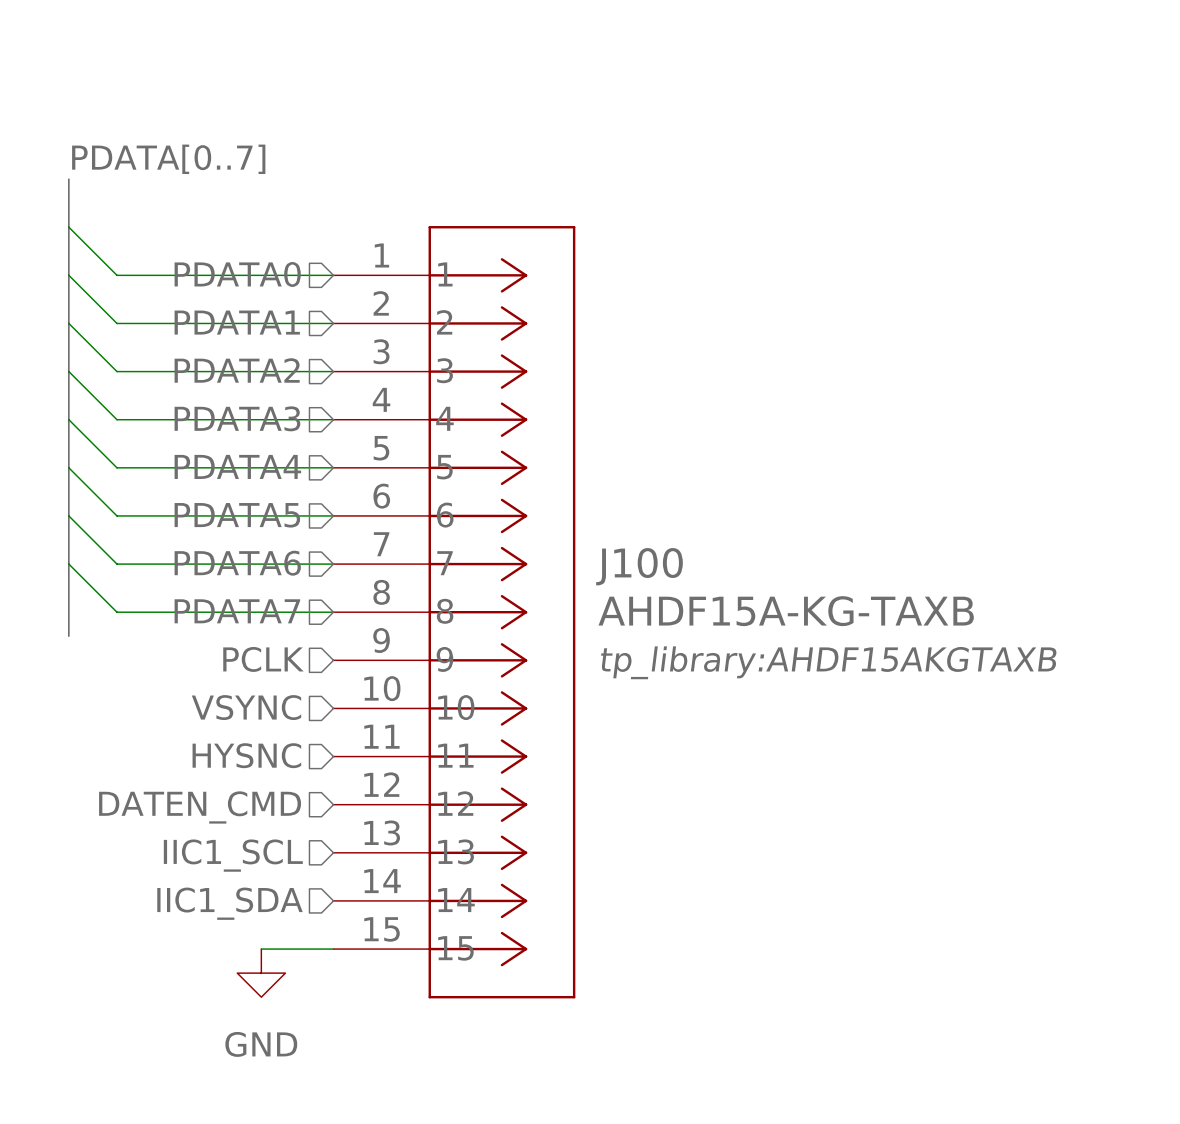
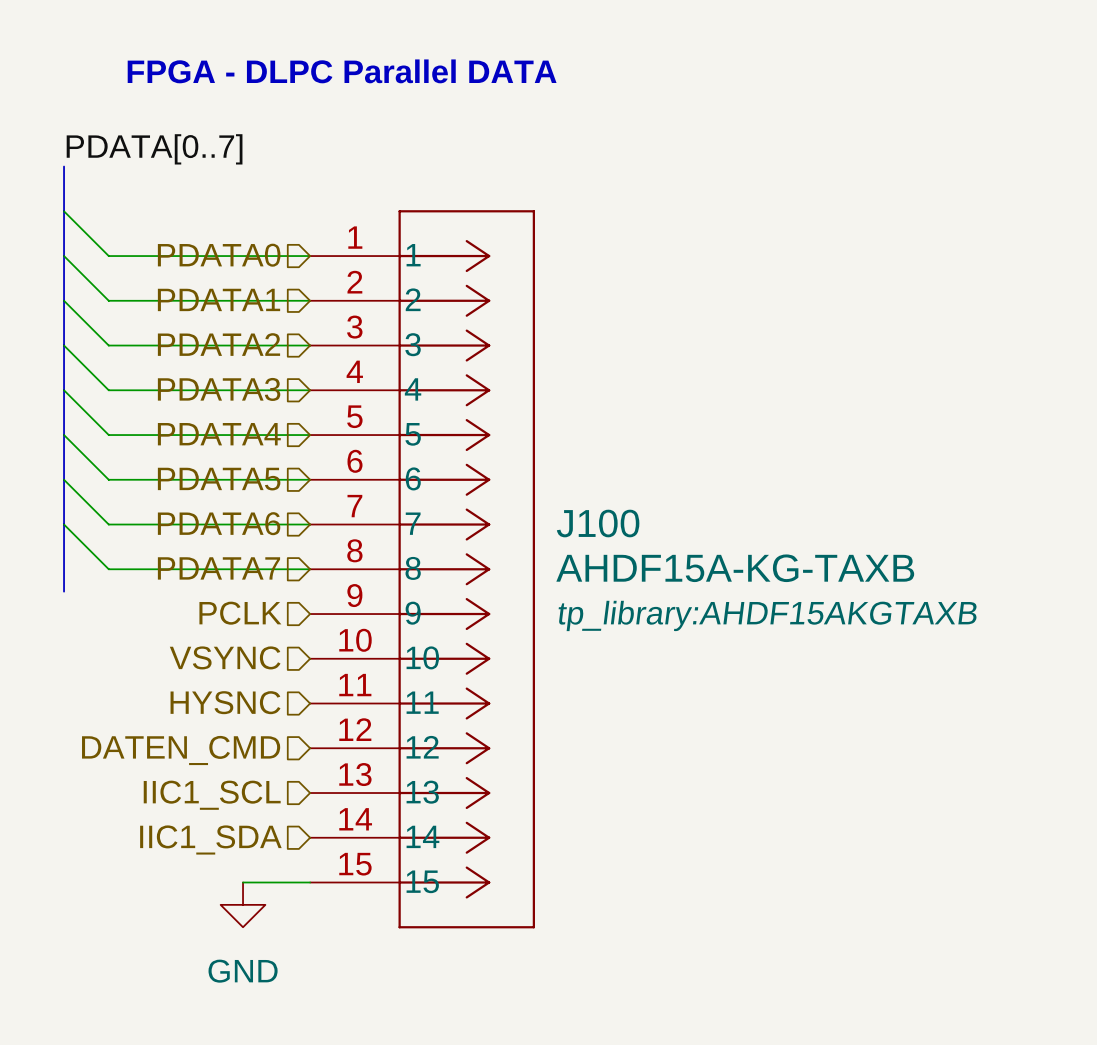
text: none -> FPGA - DLPC Parallel DATA (342, 71)

